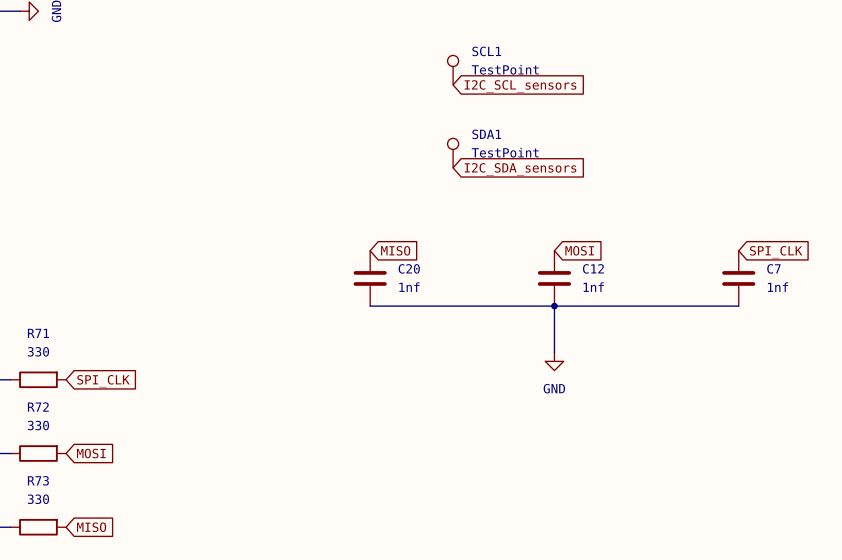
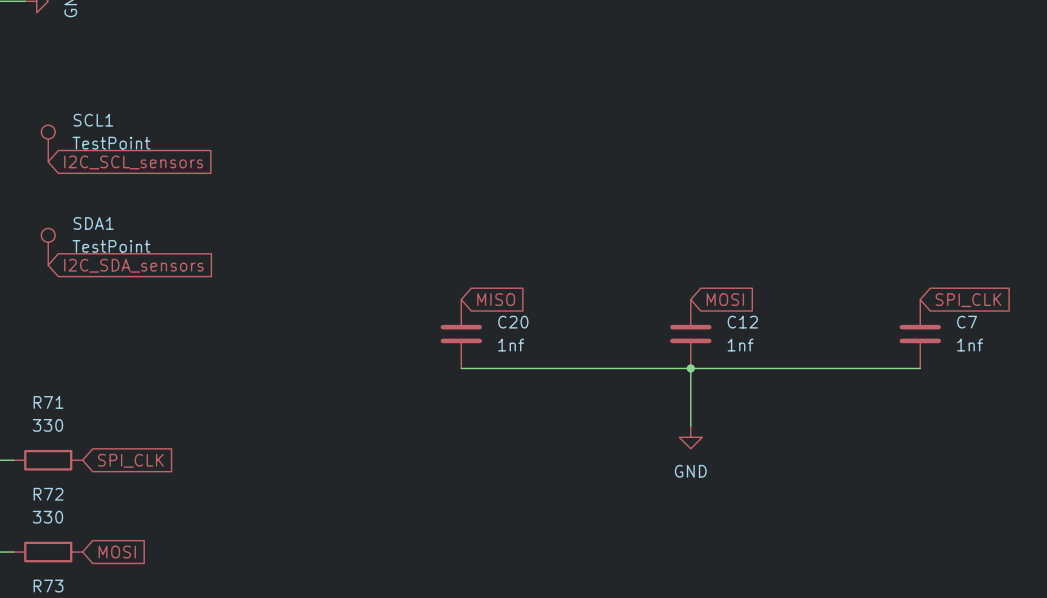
SCL1 position: (453, 70) -> (48, 143)
global label: I2C_SCL_sensors (520, 86) -> none
global label: none -> I2C_SCL_sensors (133, 162)
SDA1 position: (453, 153) -> (48, 246)
global label: I2C_SDA_sensors (520, 169) -> none
global label: none -> I2C_SDA_sensors (133, 265)

